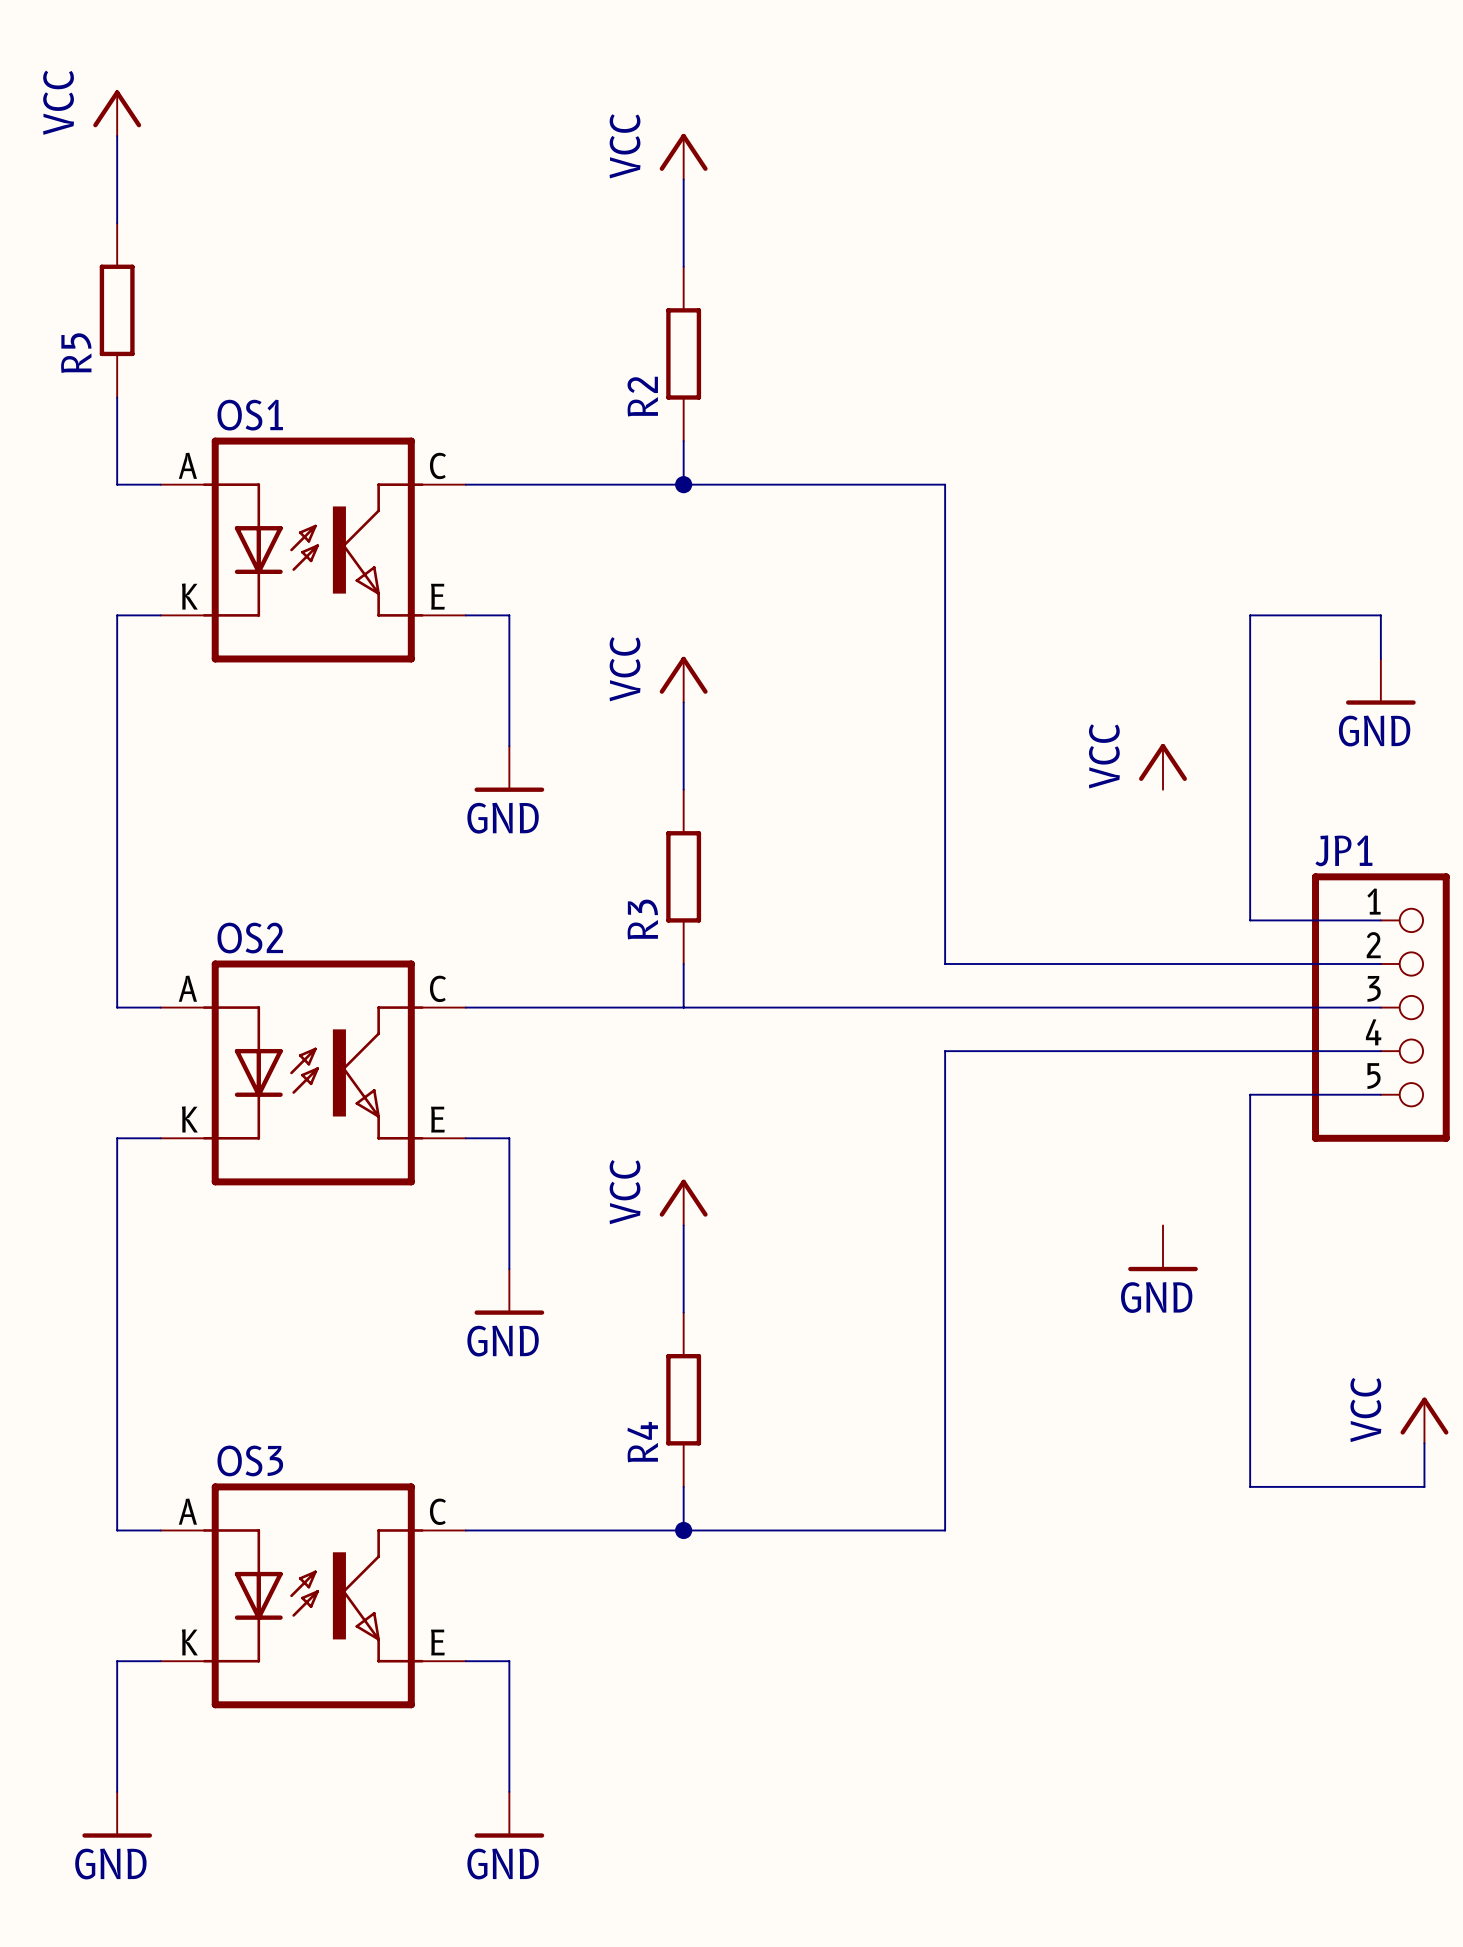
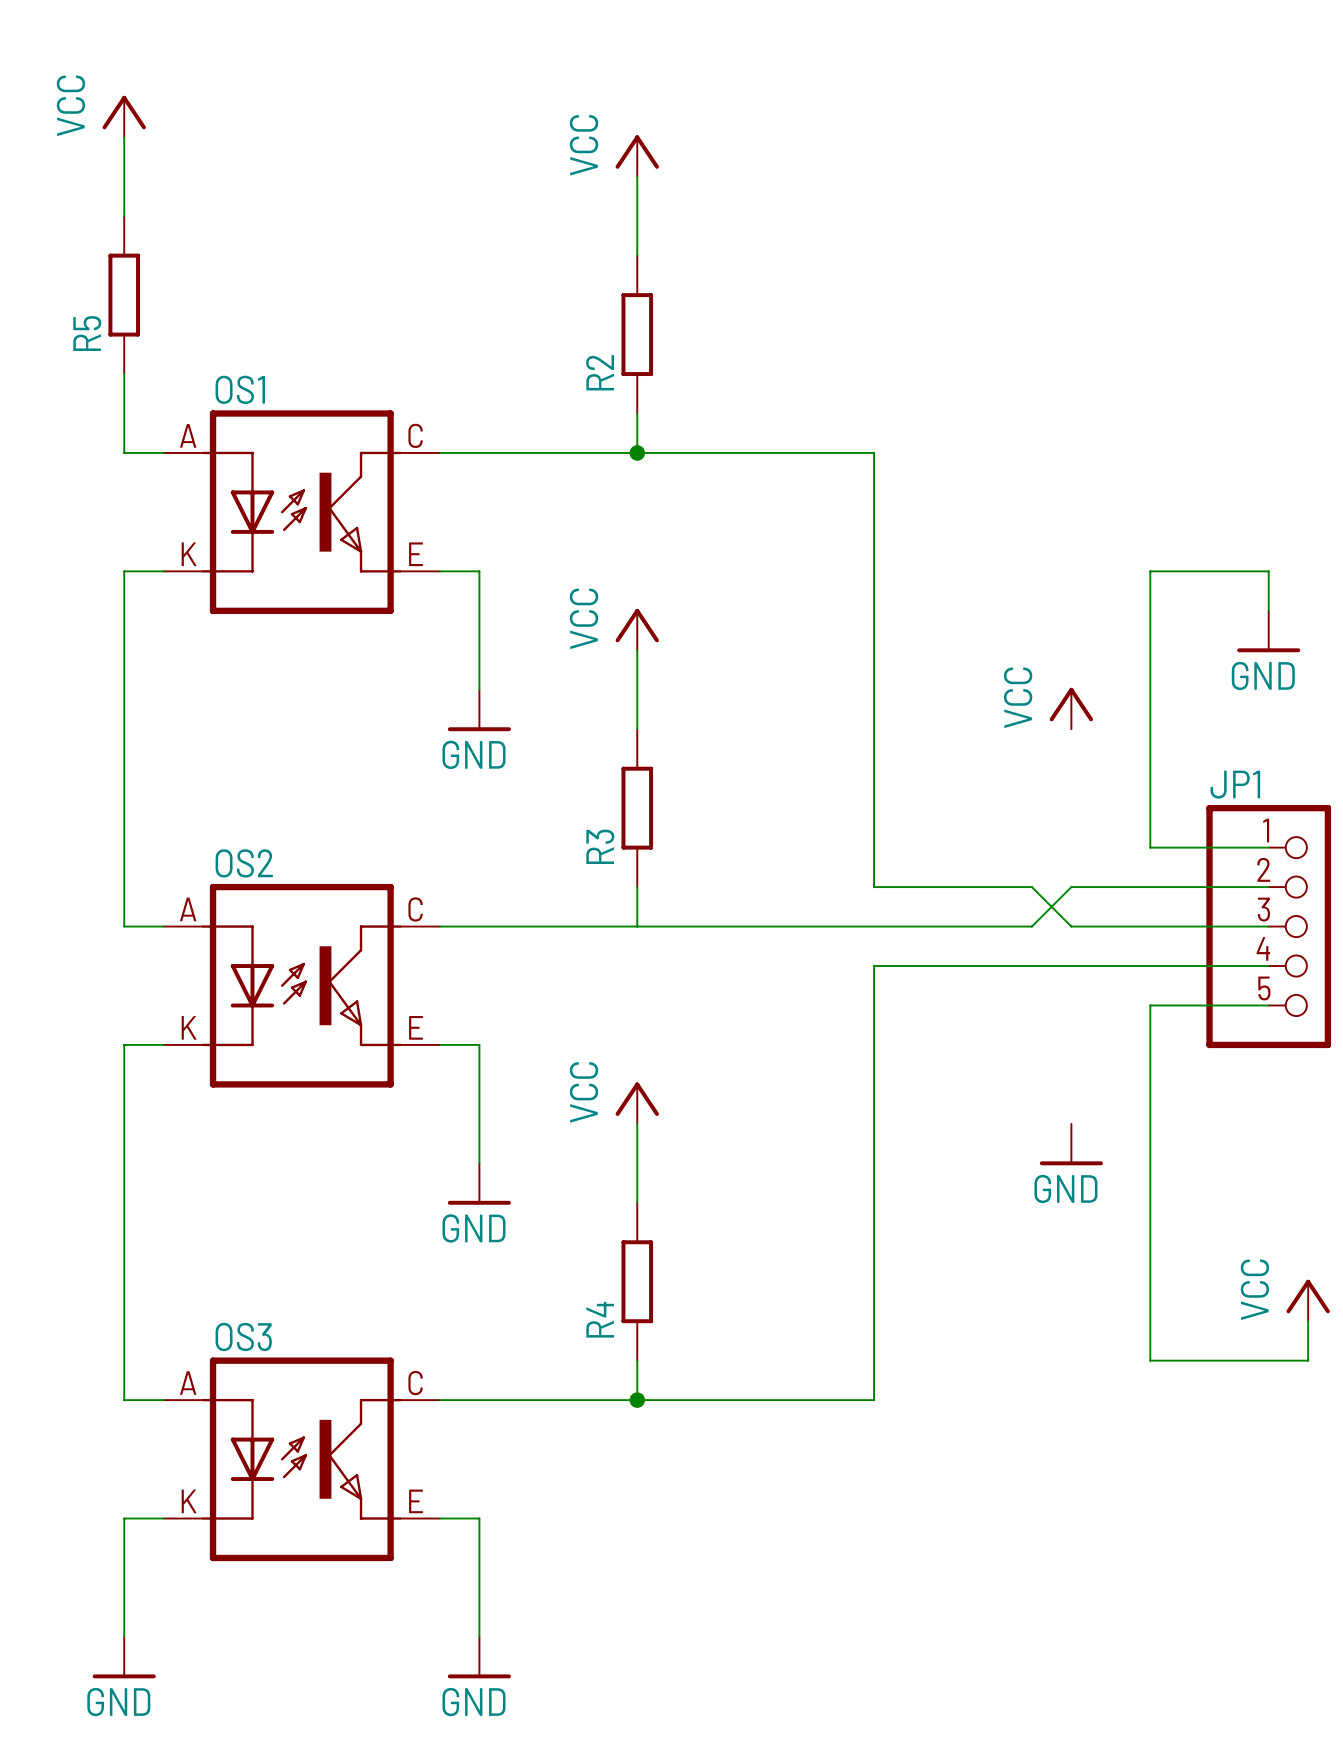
wire: (1119, 964) (1163, 964) -> (1031, 887) (1071, 926)
wire: (1119, 1007) (1163, 1007) -> (1031, 926) (1071, 887)

